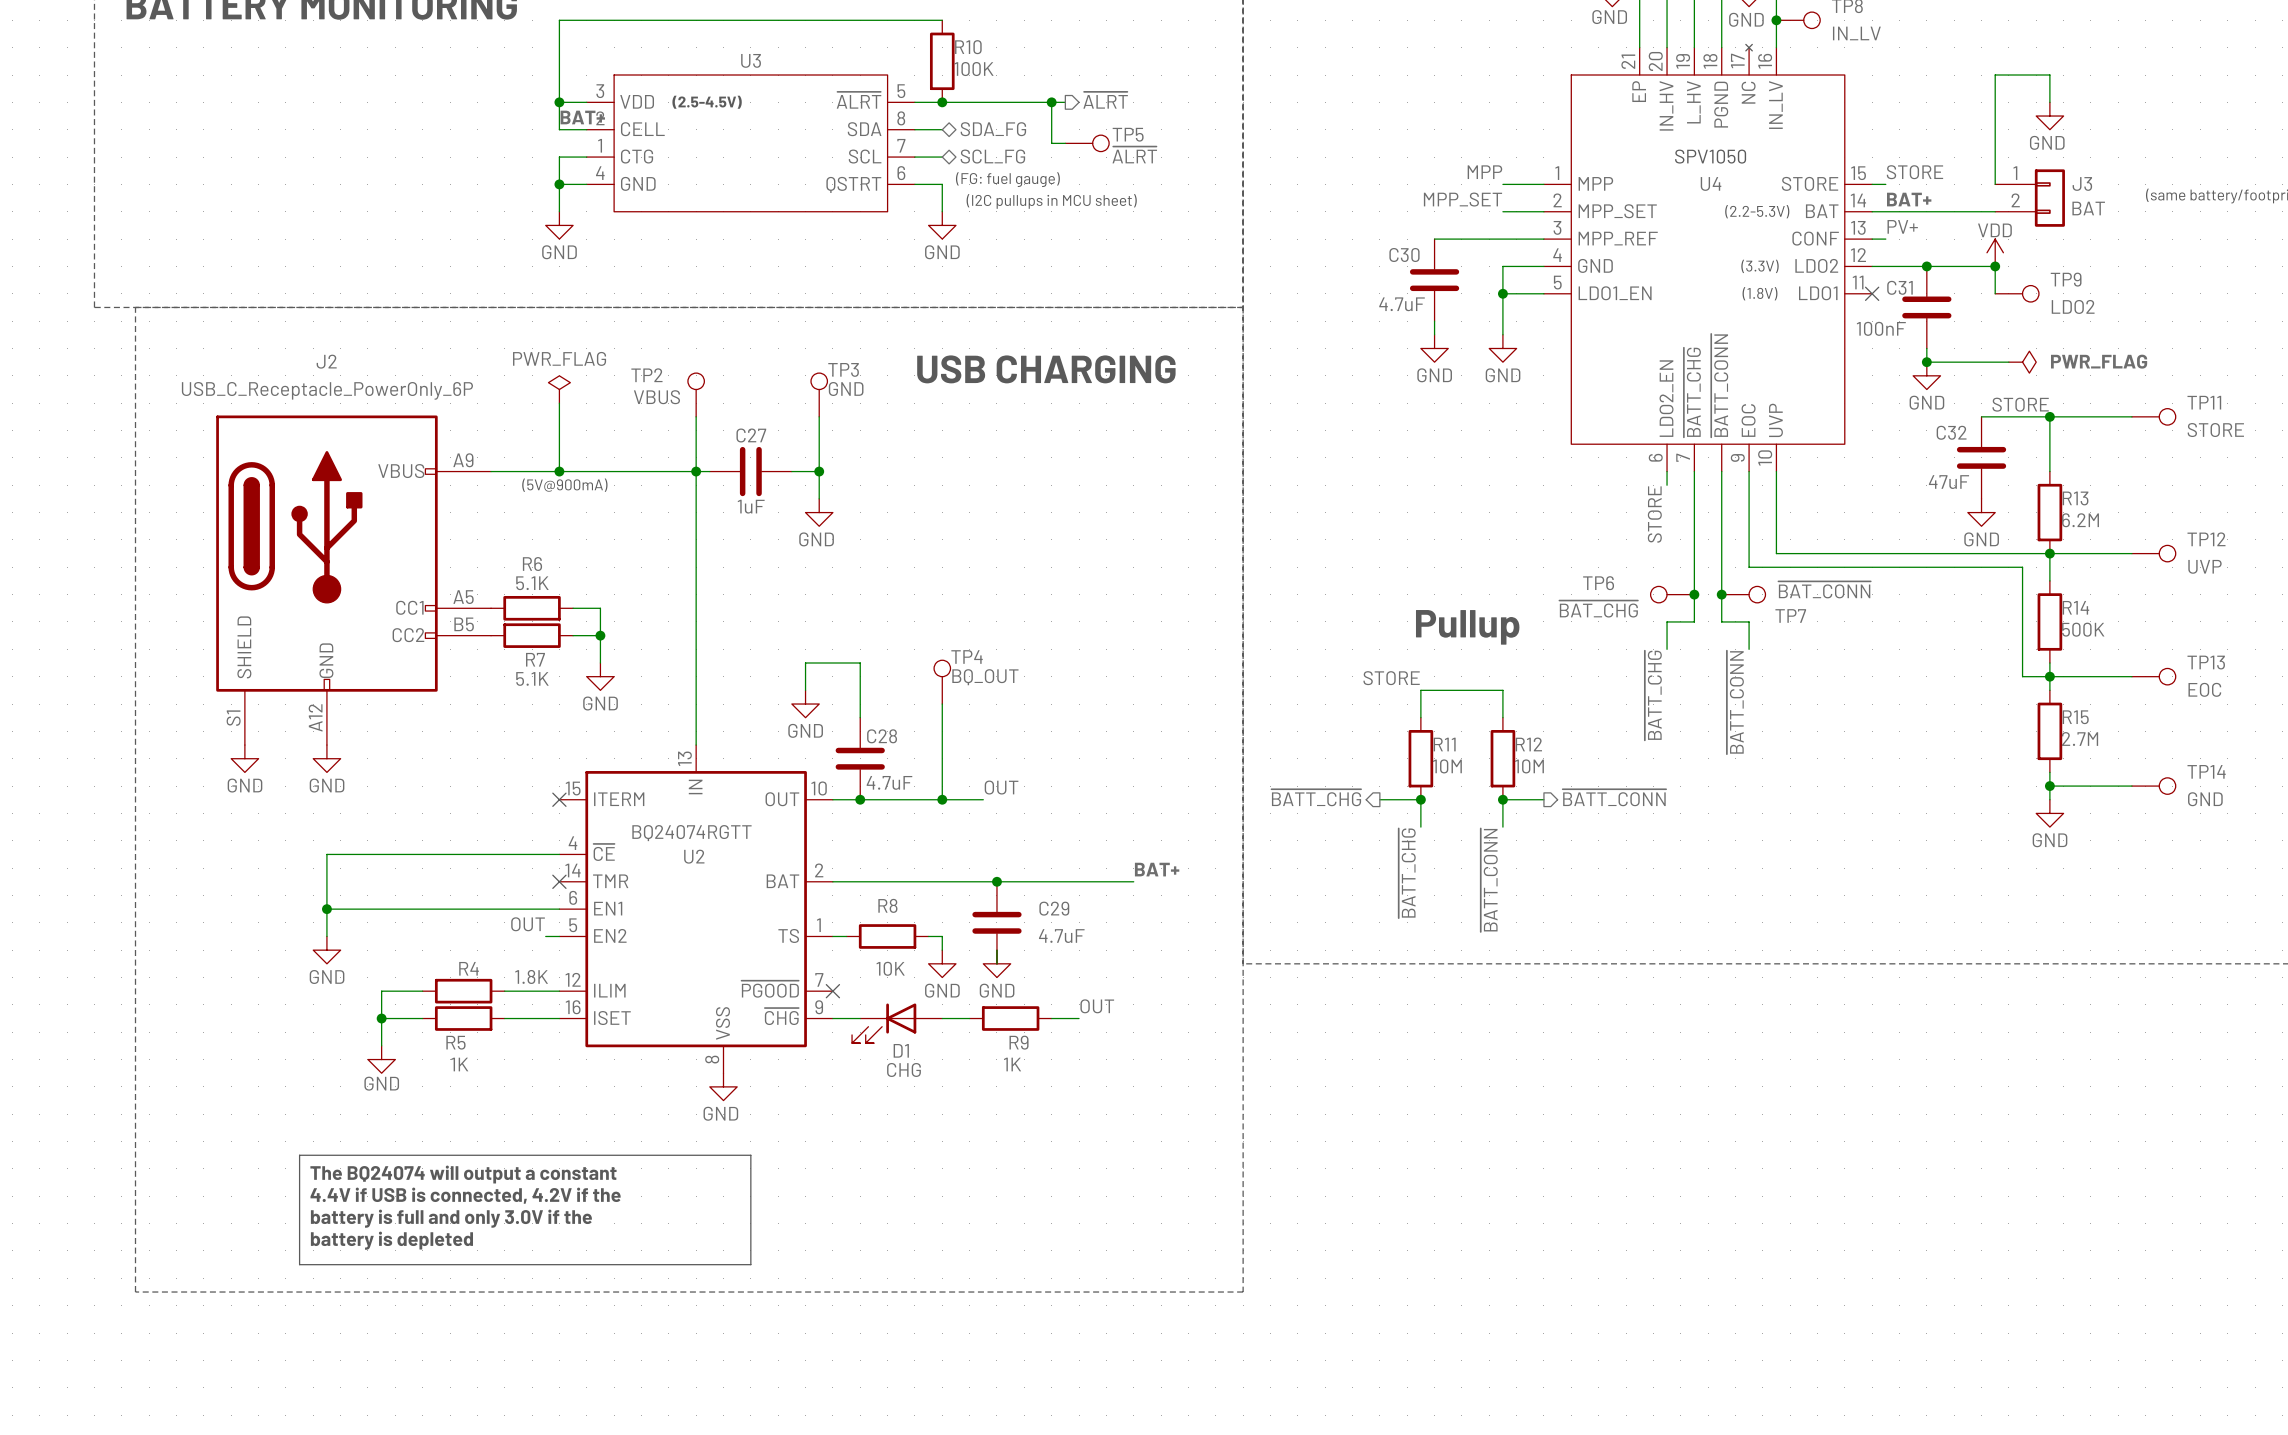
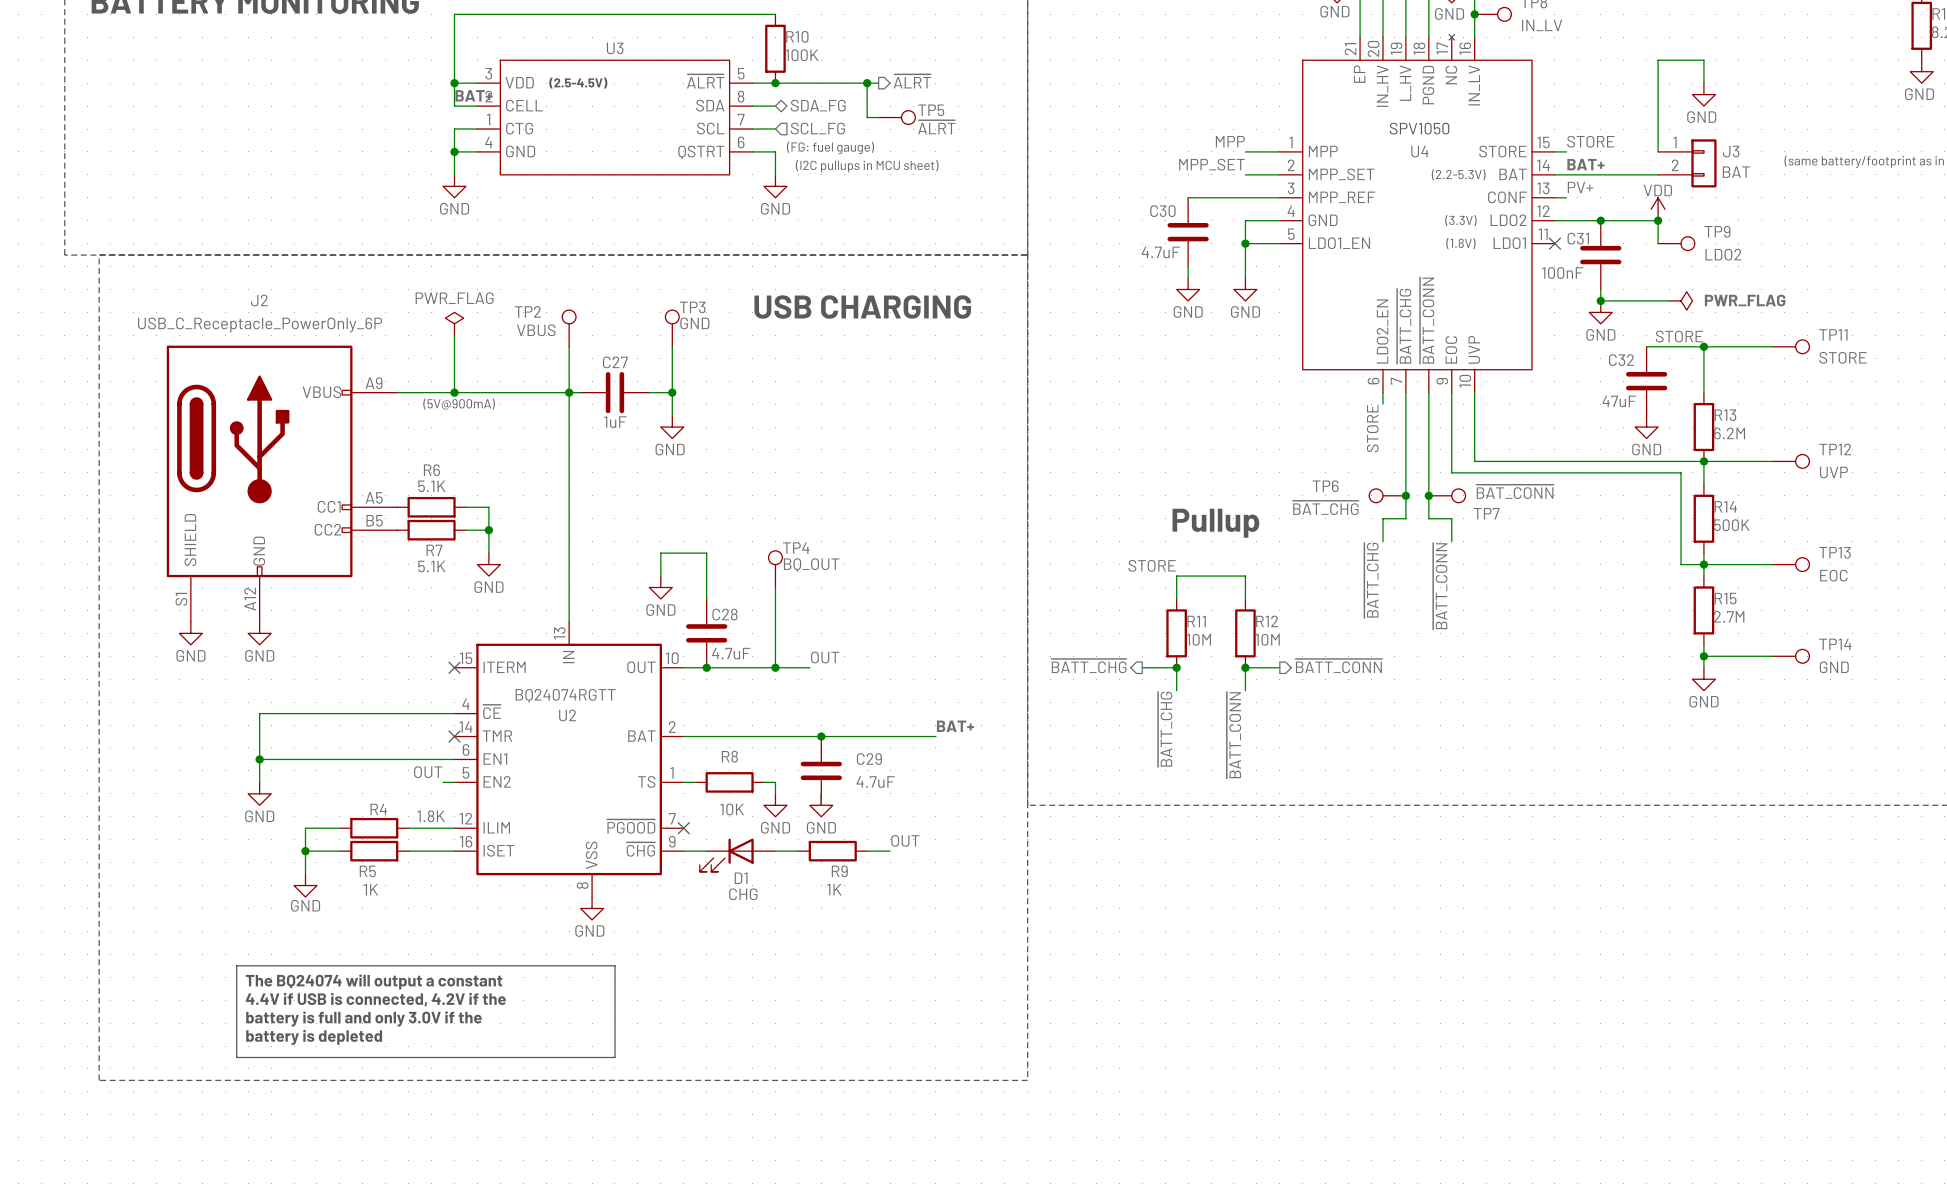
hierarchical label shape: bidirectional (992, 156) -> input (817, 128)

